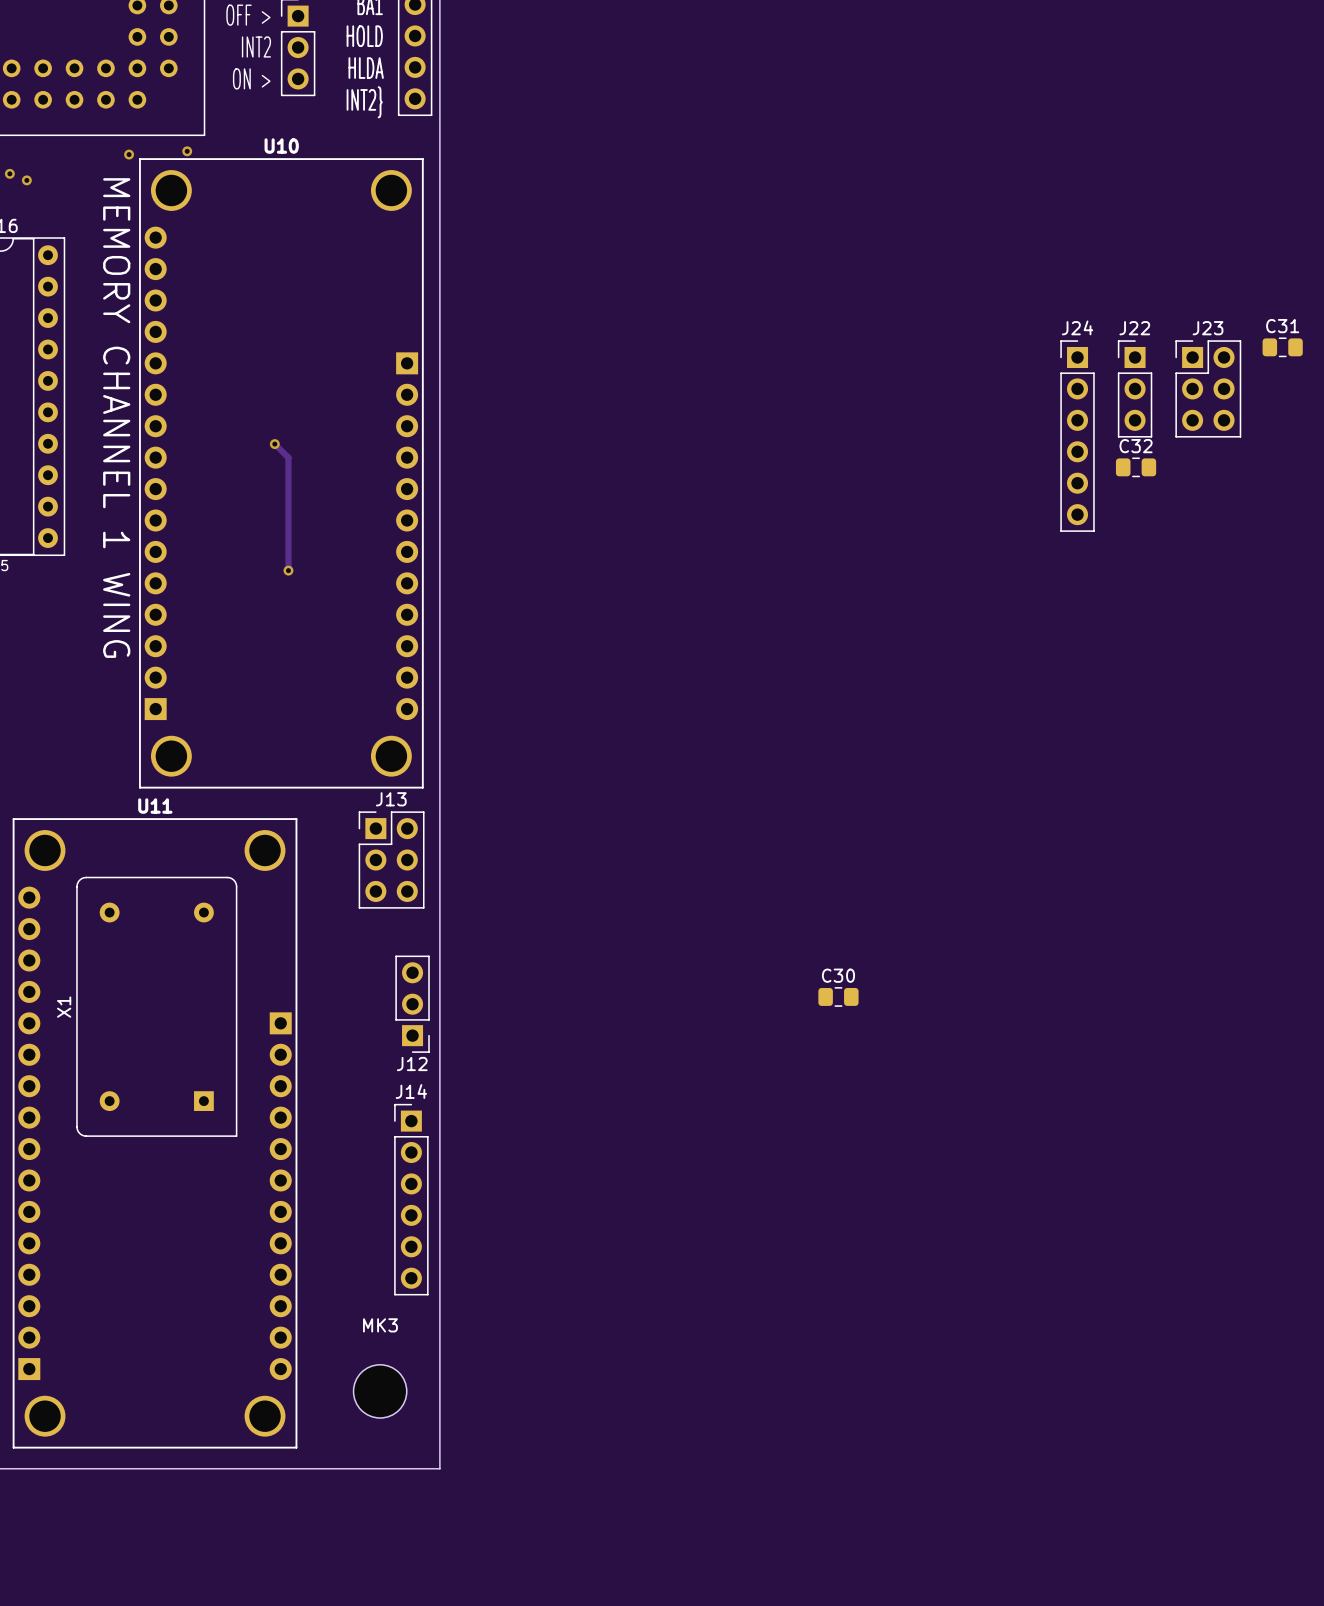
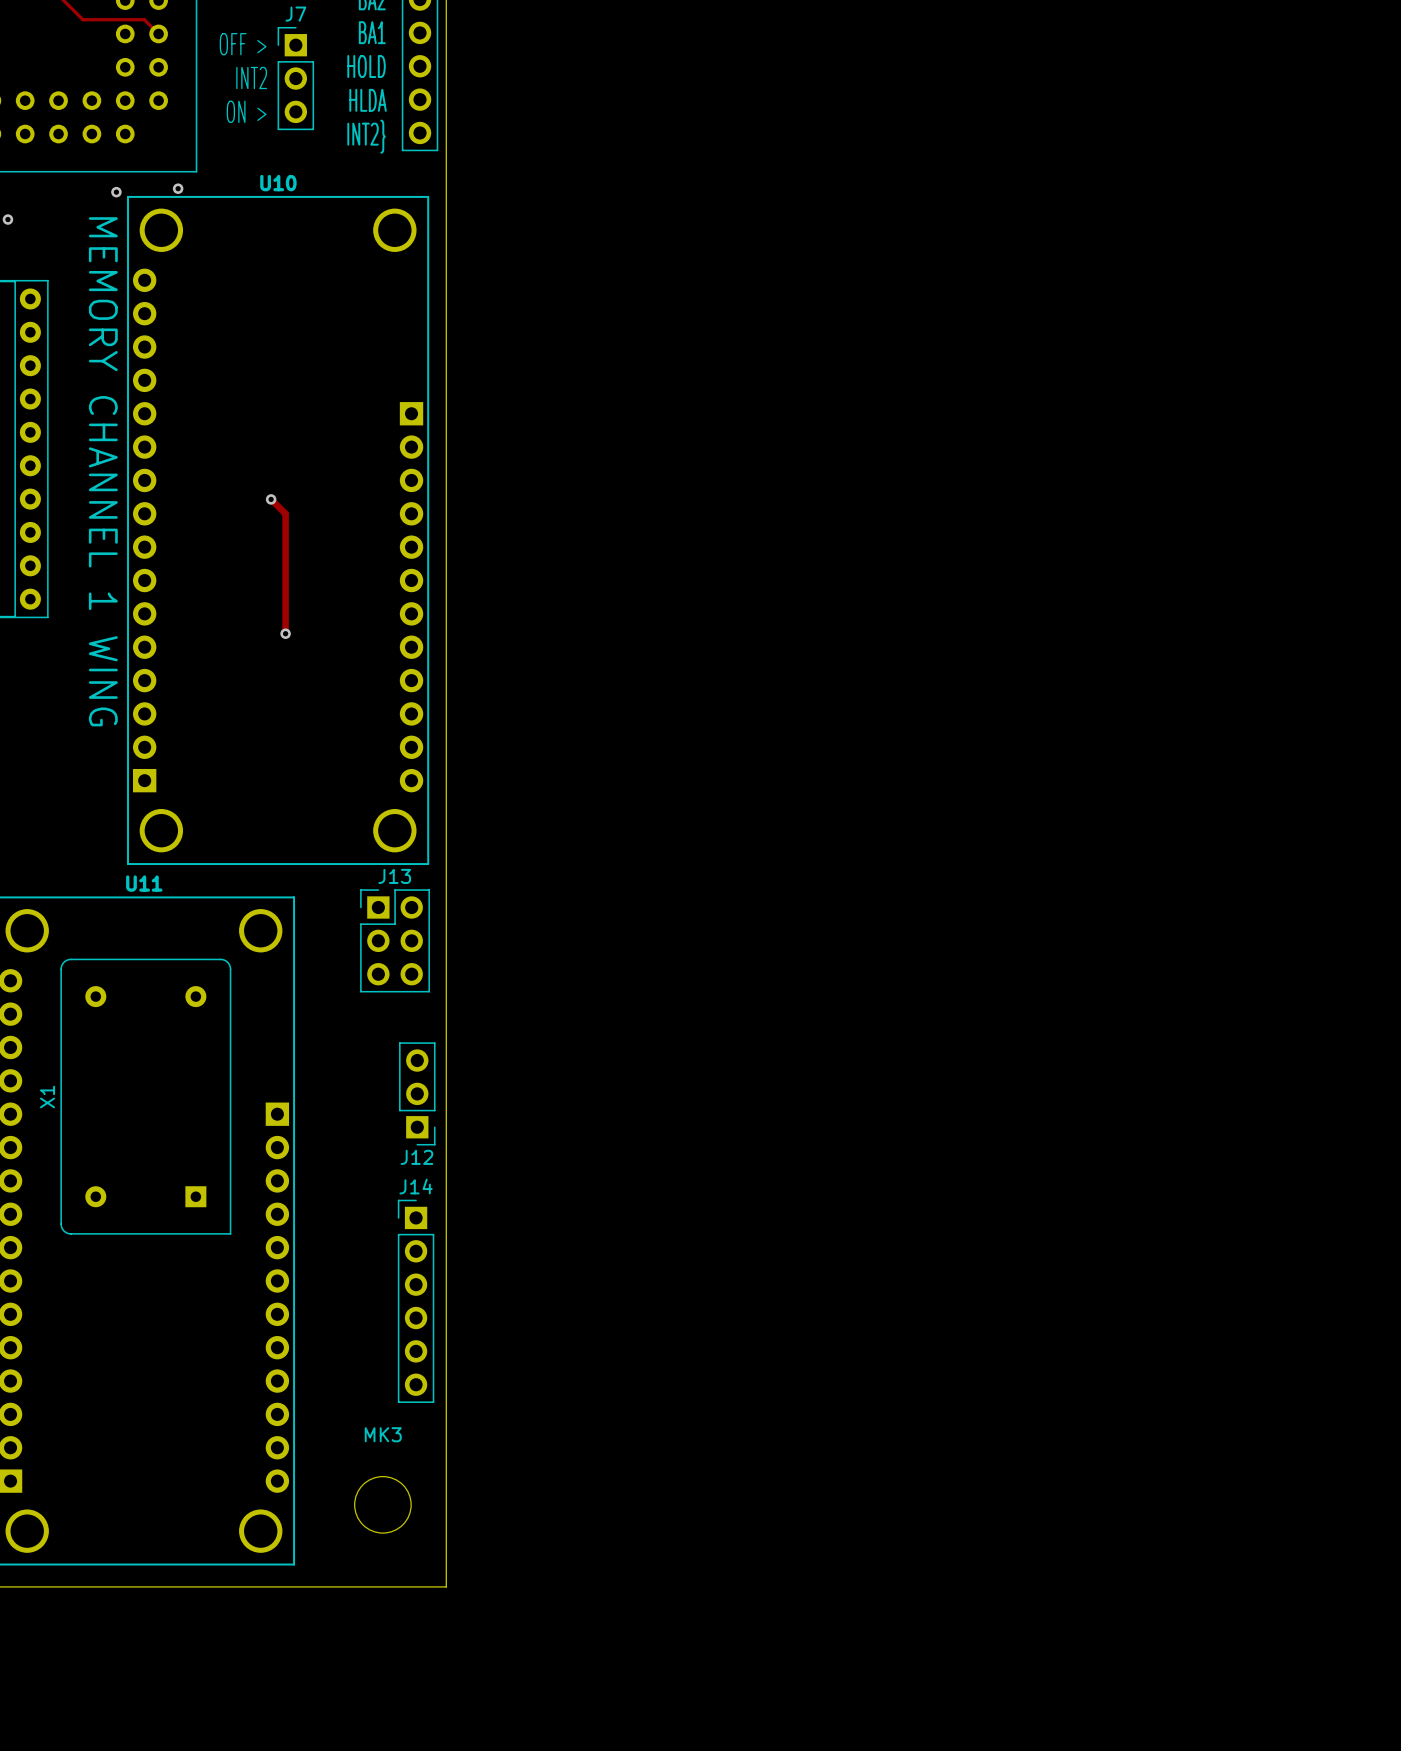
C31: (1282, 347) -> none
J22: (1135, 388) -> none
J23: (1208, 388) -> none
J24: (1077, 436) -> none
C32: (1136, 467) -> none
C30: (838, 996) -> none

